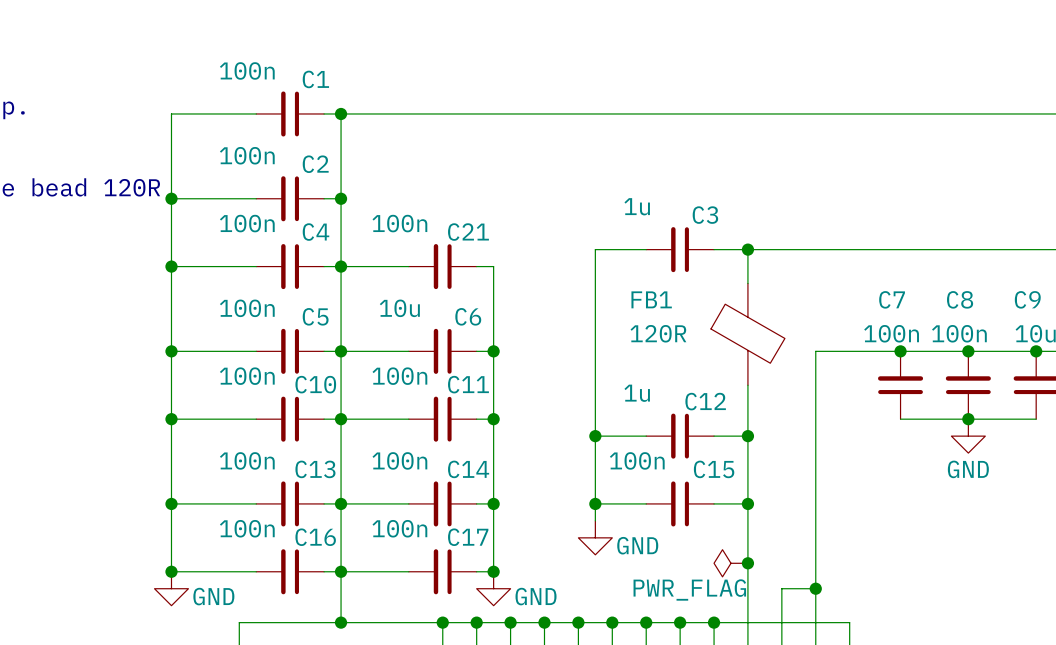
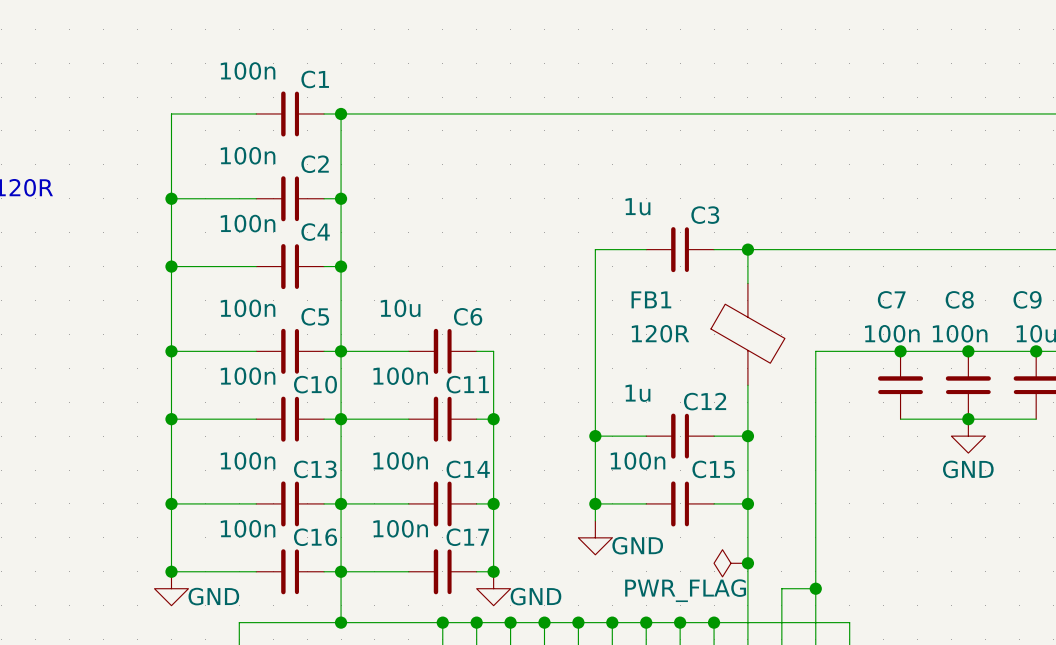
wire: (341, 266) (408, 266) -> none
C21: 100n (442, 266) -> none
wire: (476, 266) (493, 266) (493, 351) -> none
junction: (493, 351) -> none

